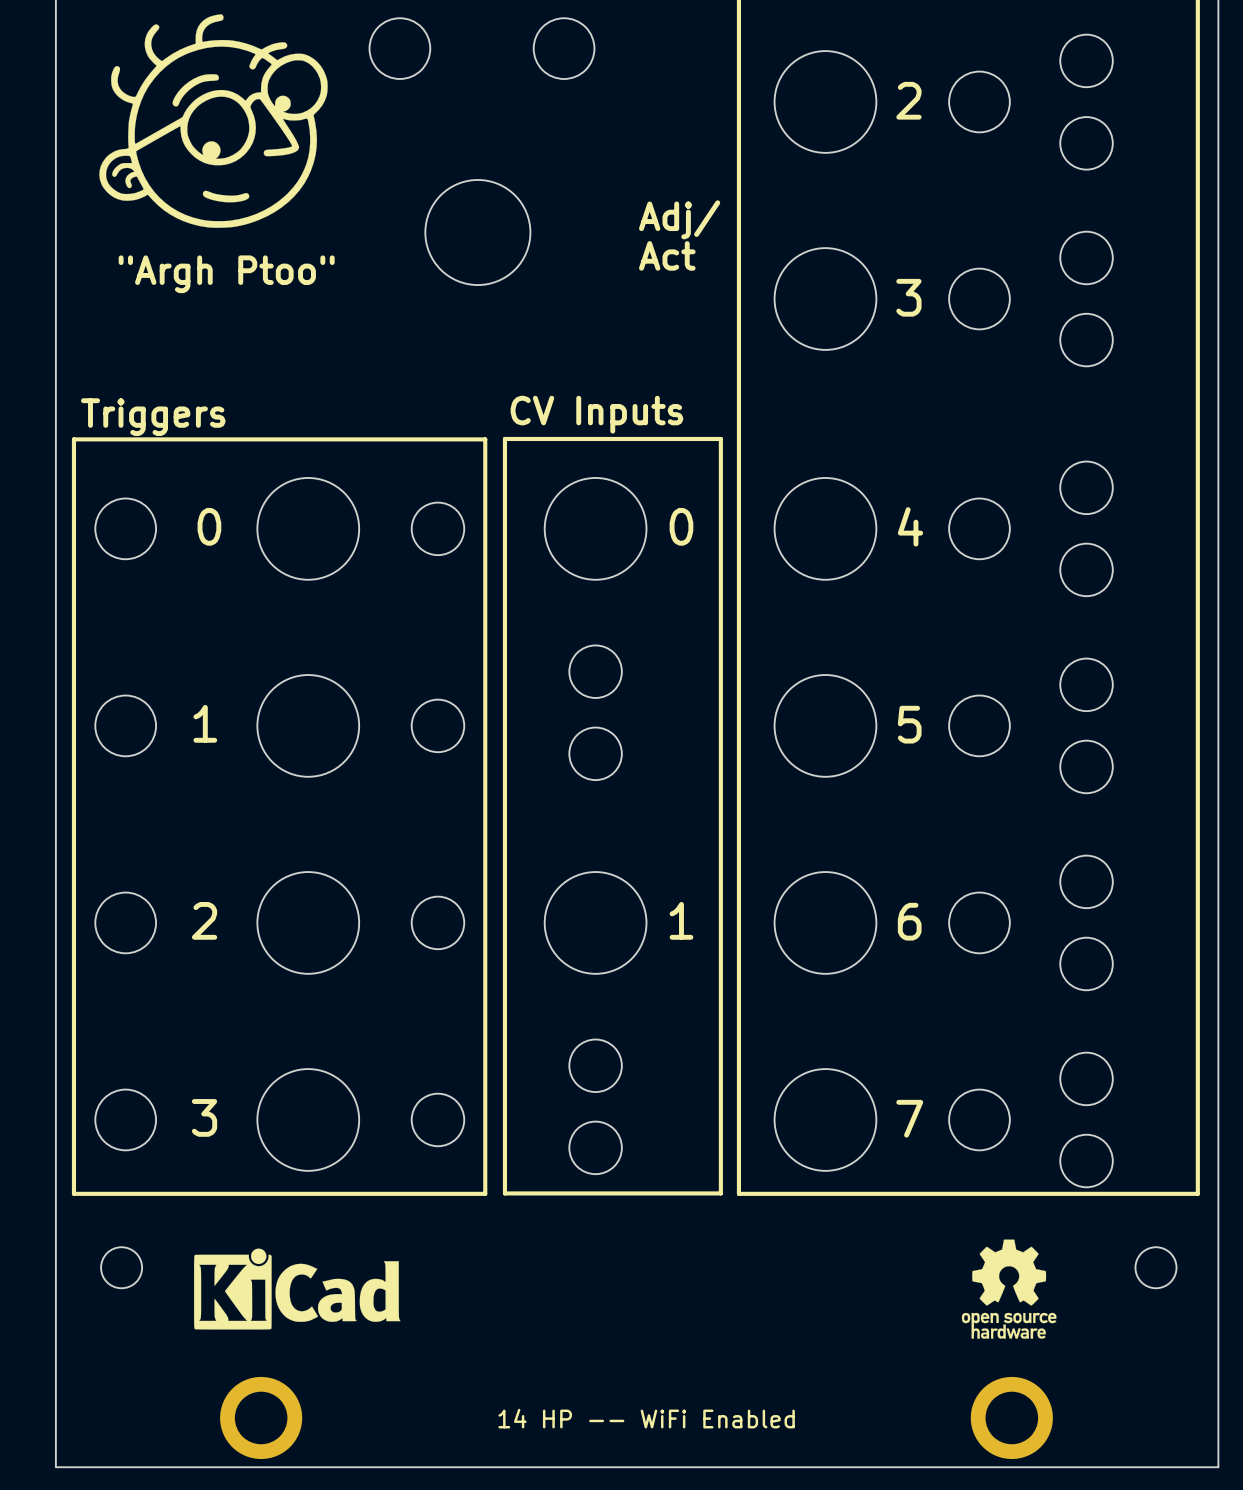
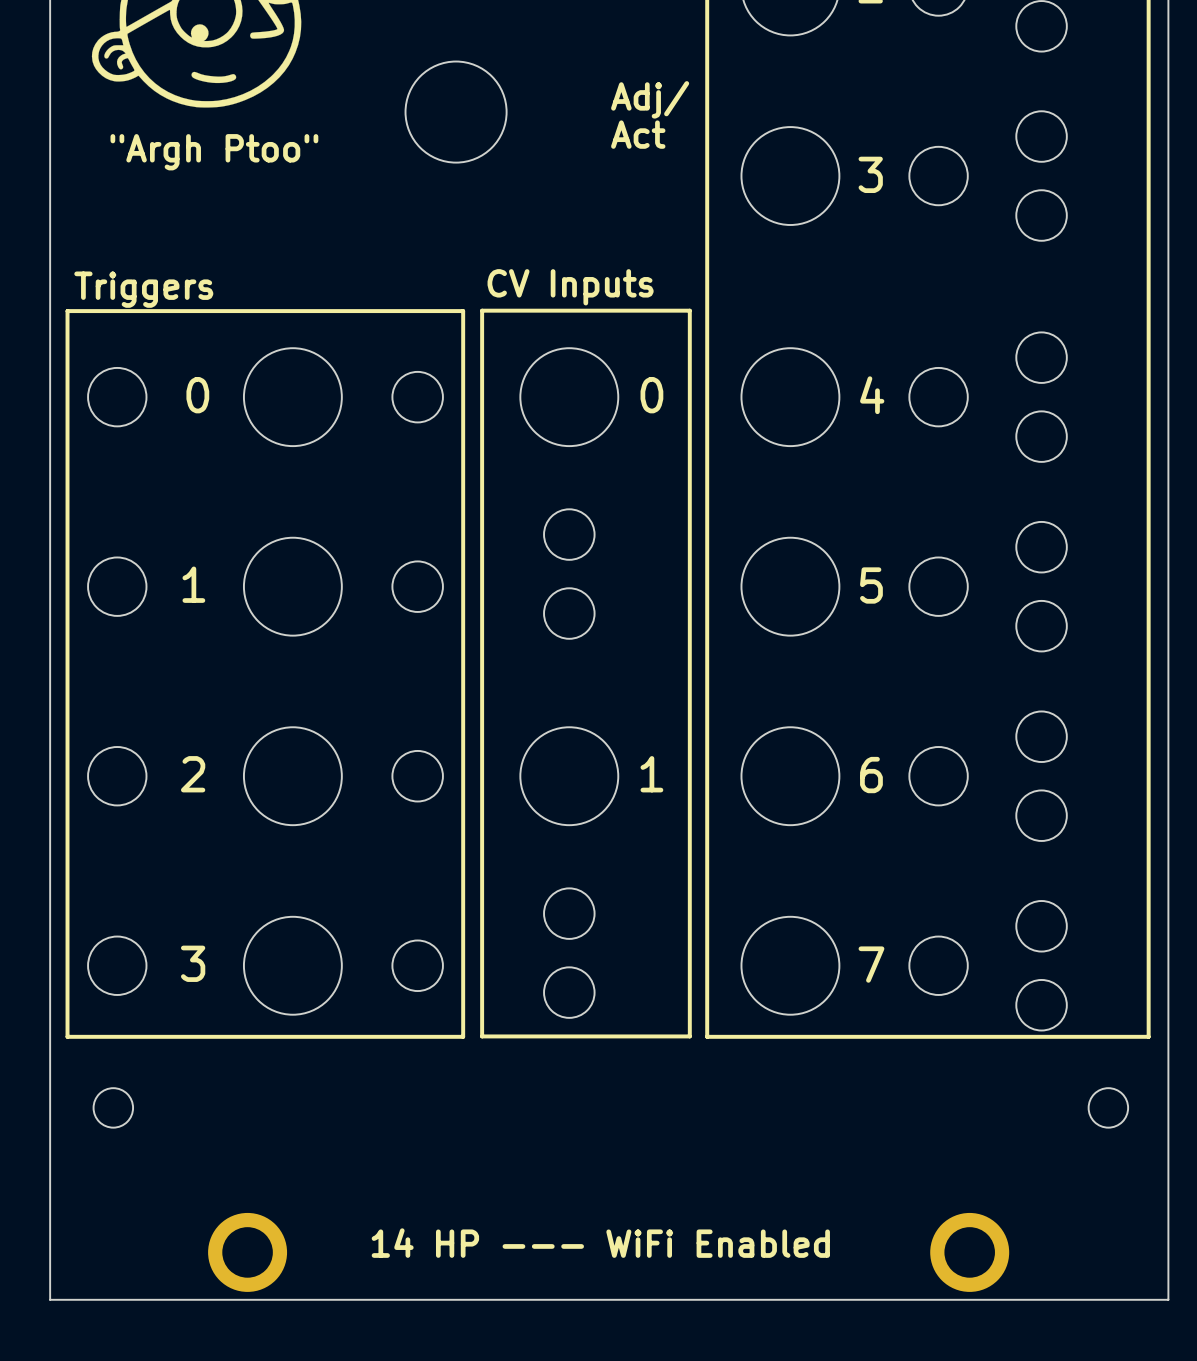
drawing: [961, 1239, 1057, 1339] -> none
drawing: [194, 1248, 401, 1330] -> none
text: 14 HP -- WiFi Enabled (646, 1418) -> 14 HP --- WiFi Enabled (600, 1243)

